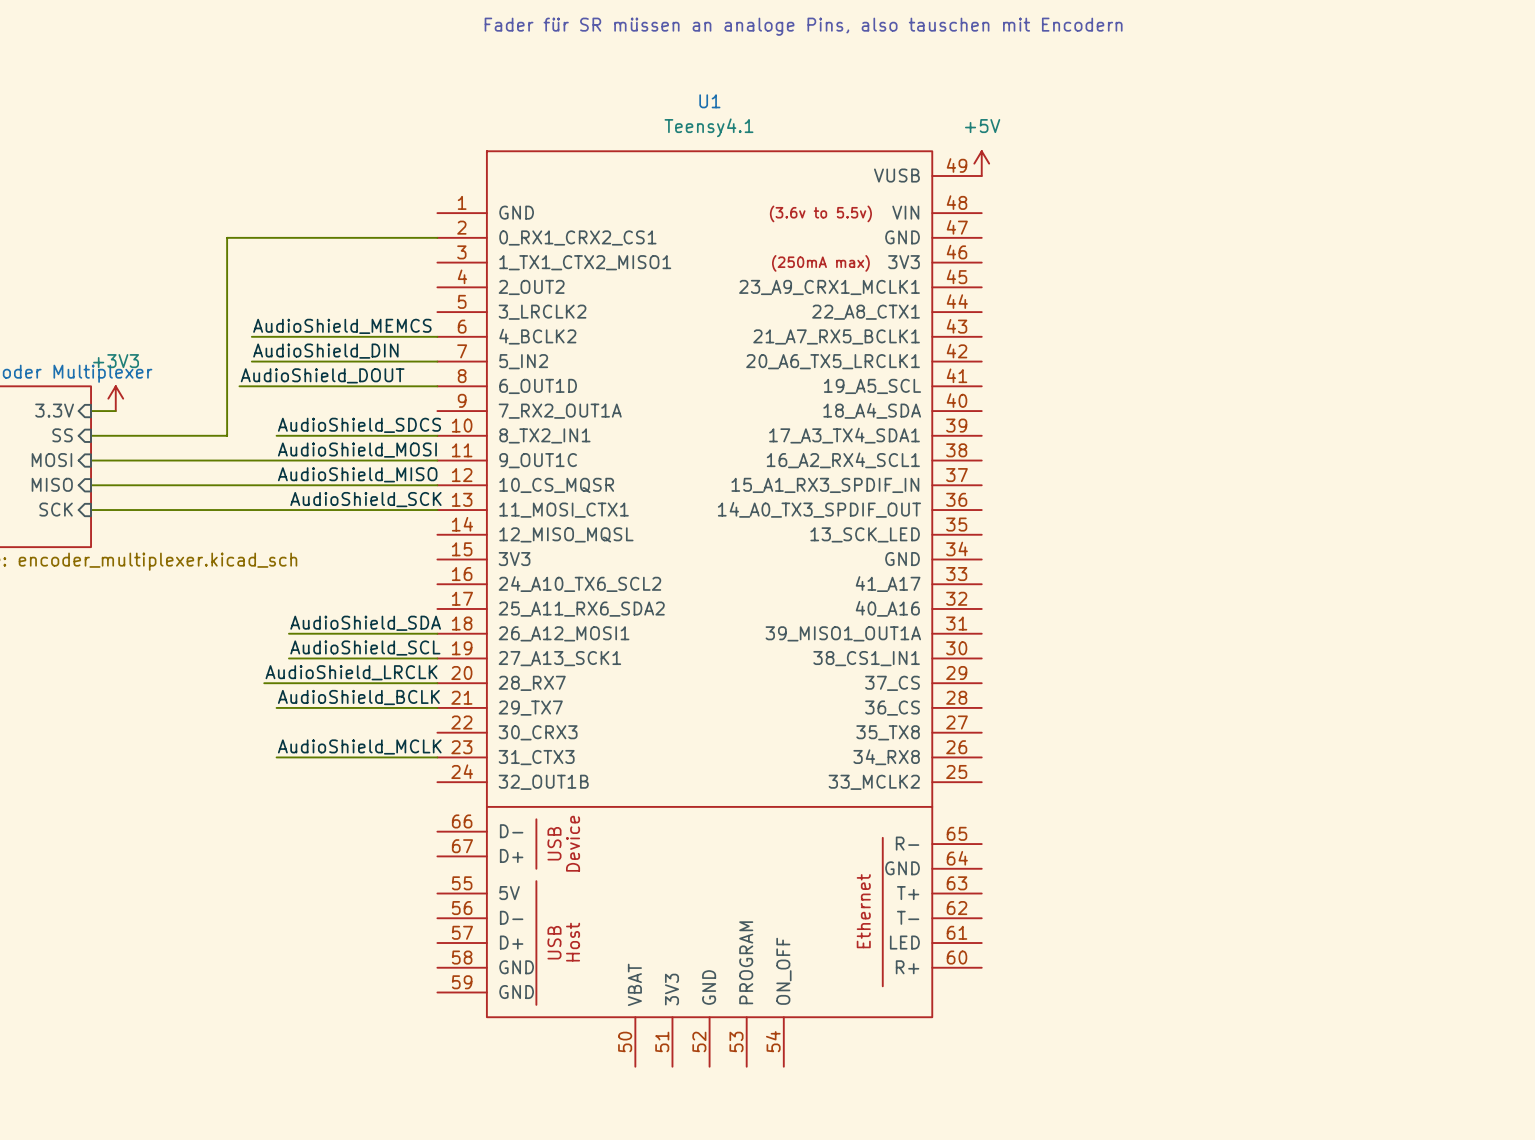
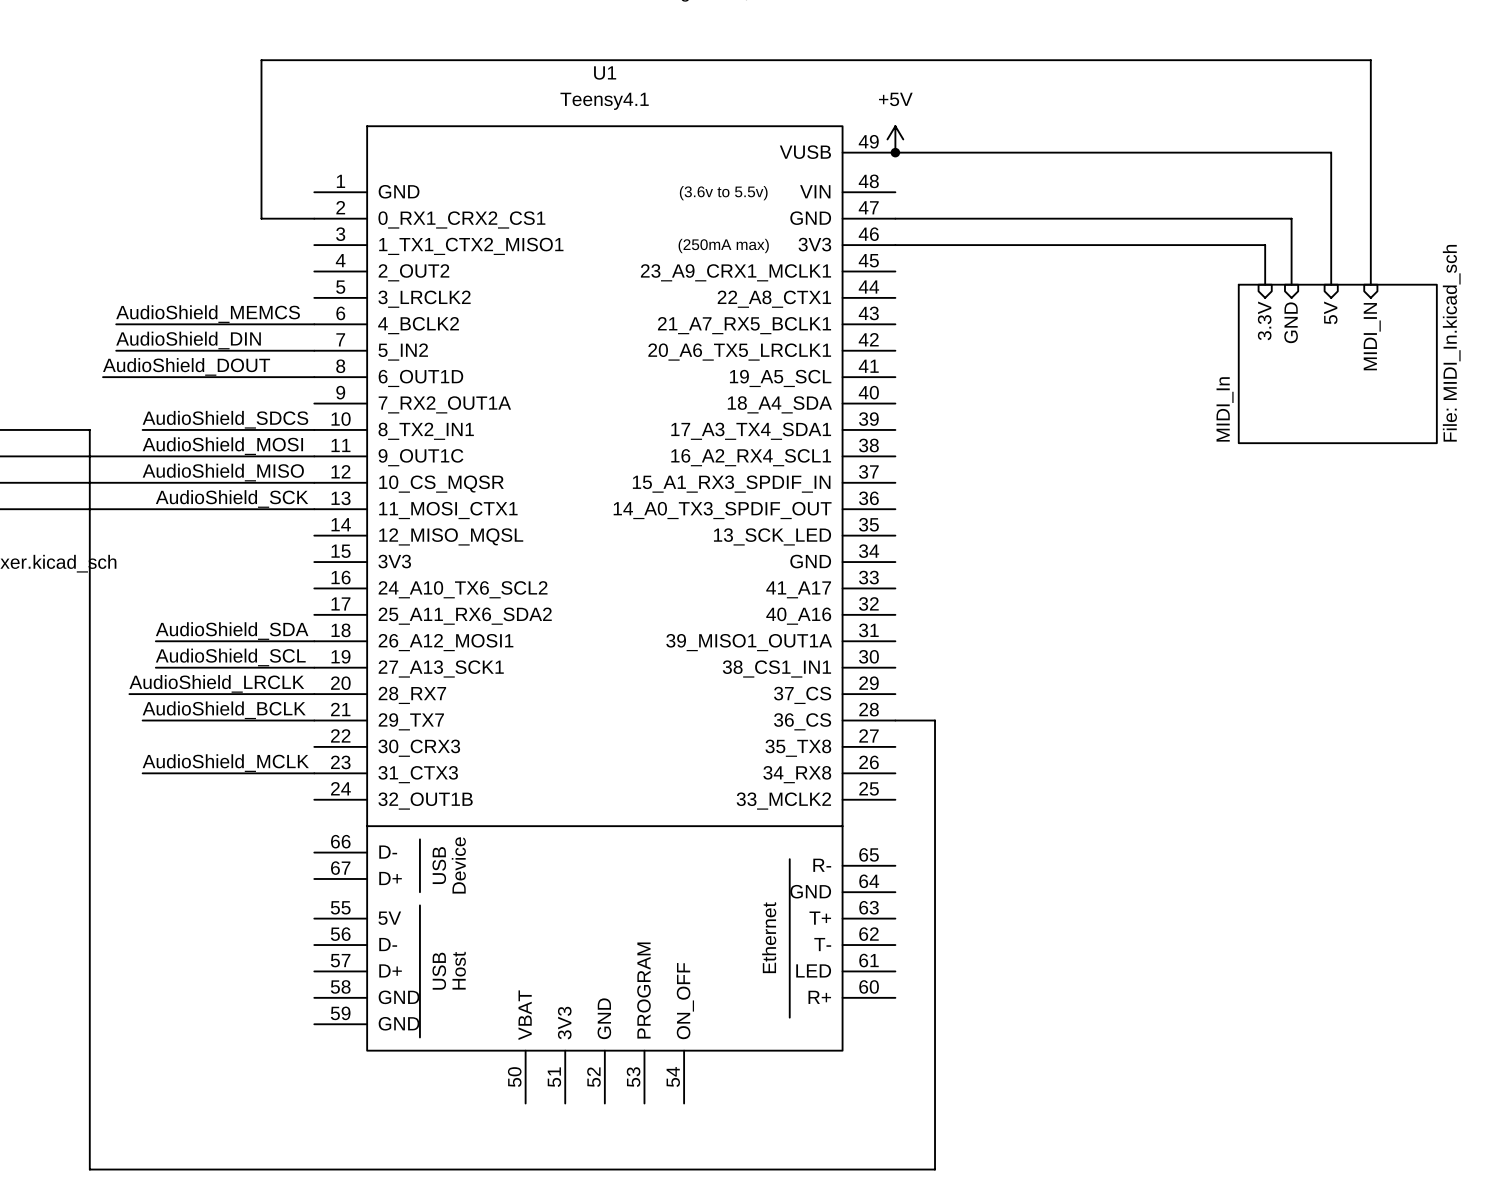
wire: none -> (895, 152) (1331, 152) (1331, 284)
junction: none -> (895, 152)
wire: (387, 237) (227, 237) (227, 435) -> (895, 720) (935, 720) (935, 1169) (89, 1169) (89, 429)
wire: none -> (261, 218) (261, 60) (1370, 60) (1370, 284)
wire: none -> (895, 218) (1291, 218) (1291, 284)
wire: none -> (895, 245) (1265, 245) (1265, 284)
sheet pin: none -> 5V (1330, 312)
sheet pin: none -> GND (1291, 322)
sheet pin: none -> 3.3V (1264, 320)
sheet pin: none -> MIDI_IN (1372, 336)
sheet MIDI_In: none -> File: MIDI_In.kicad_sch (1337, 363)

